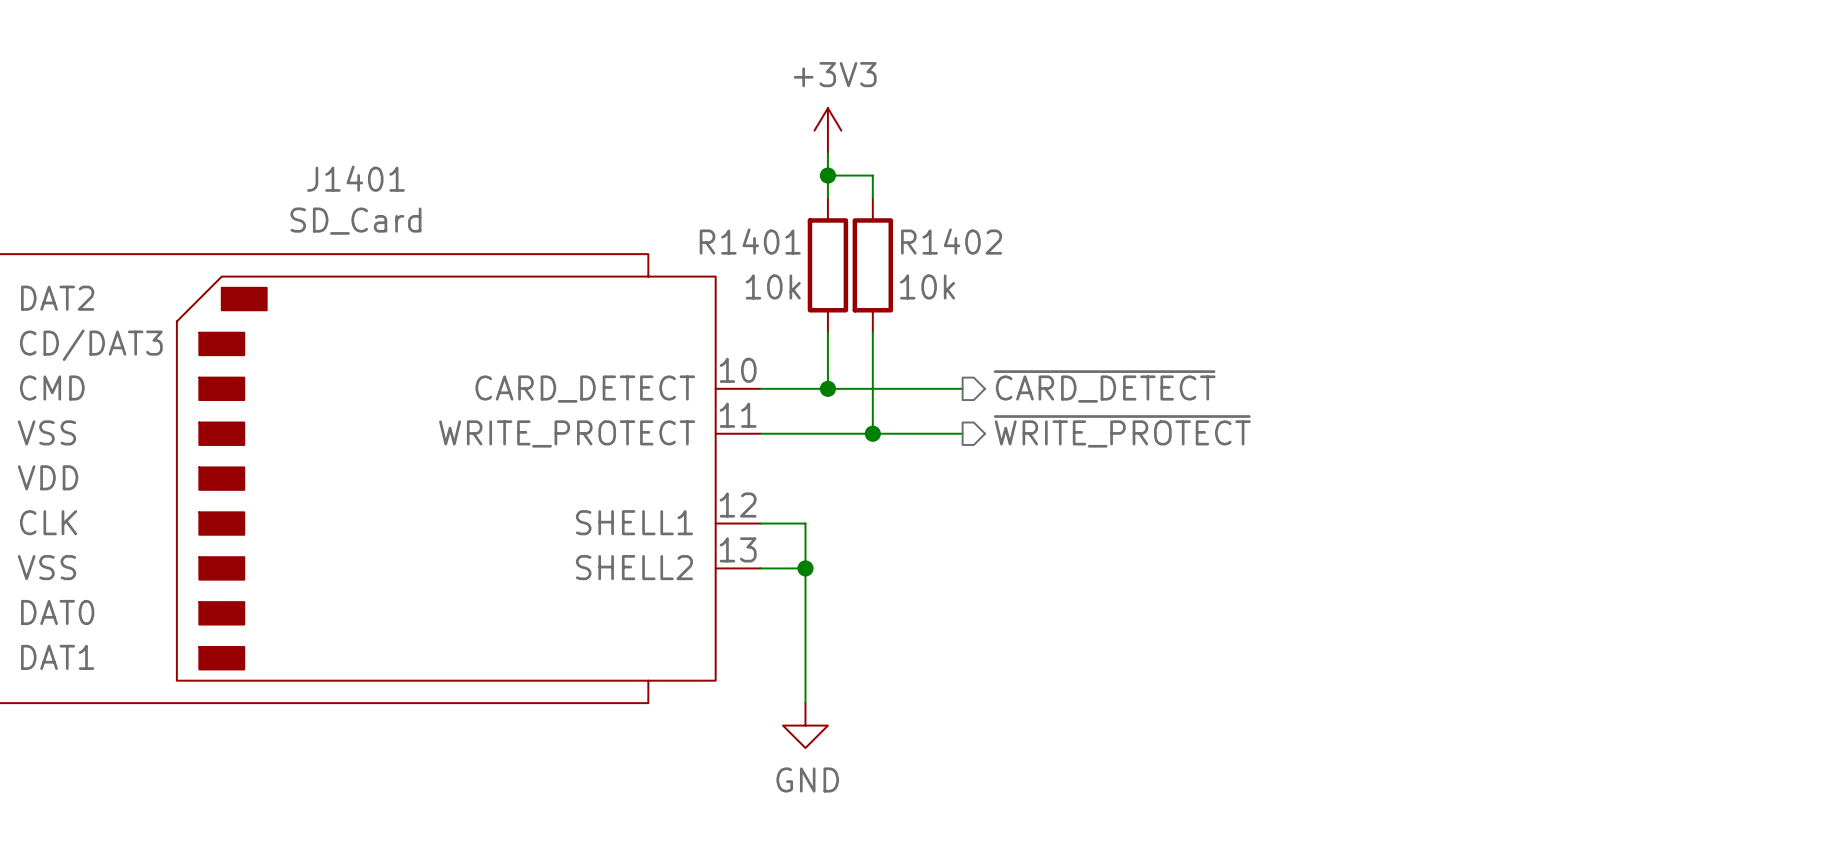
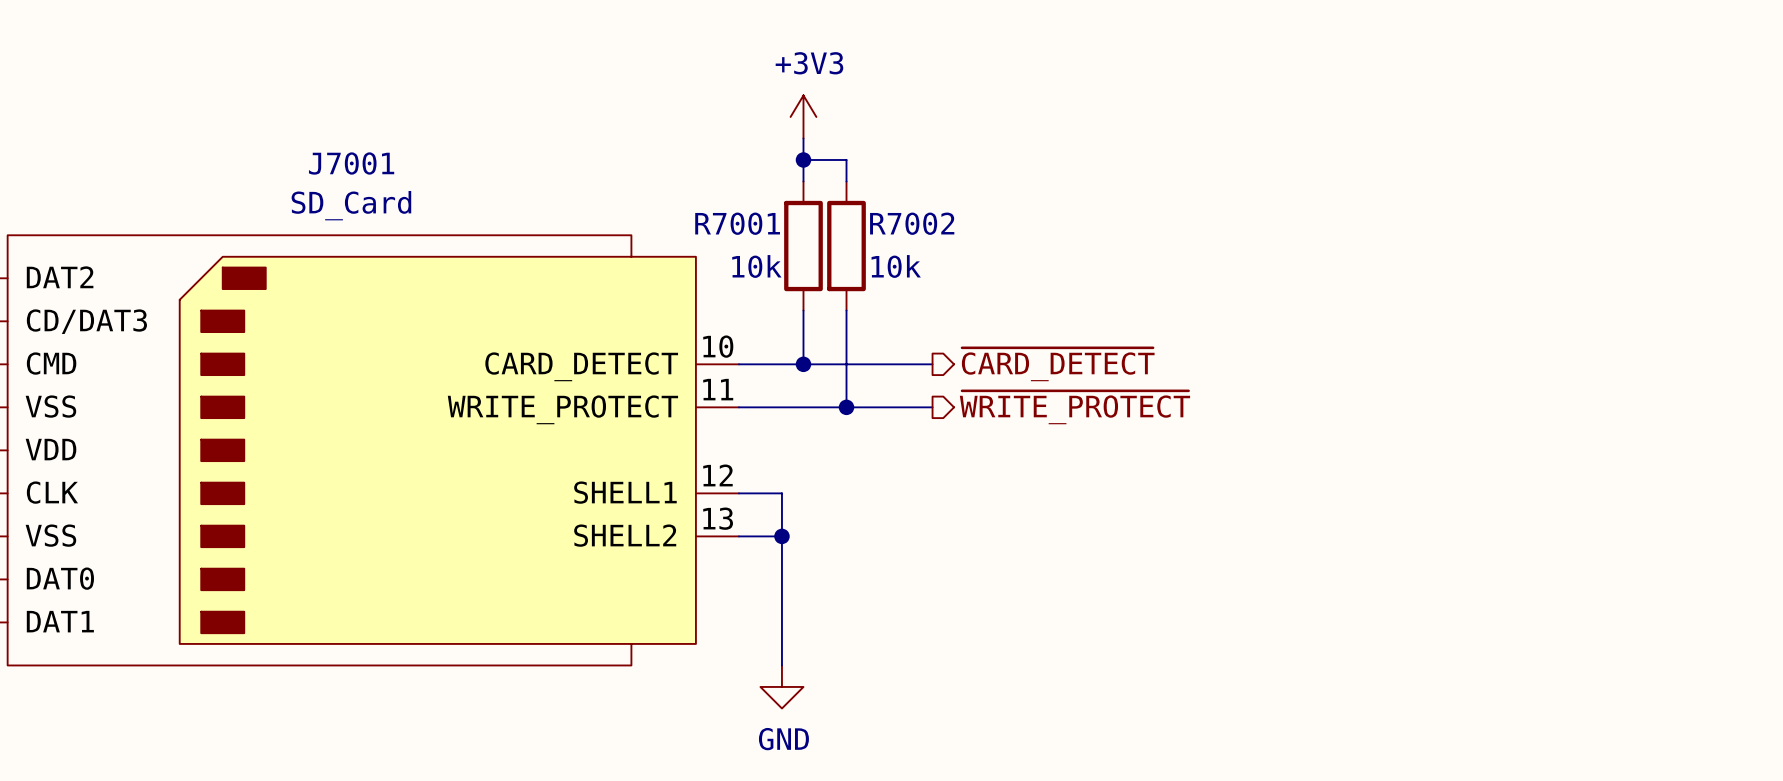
J1401 name: J1401 (355, 178) -> J7001 (351, 163)
R1401 name: R1401 (750, 241) -> R7001 (737, 223)
R1402 name: R1402 (951, 241) -> R7002 (912, 223)

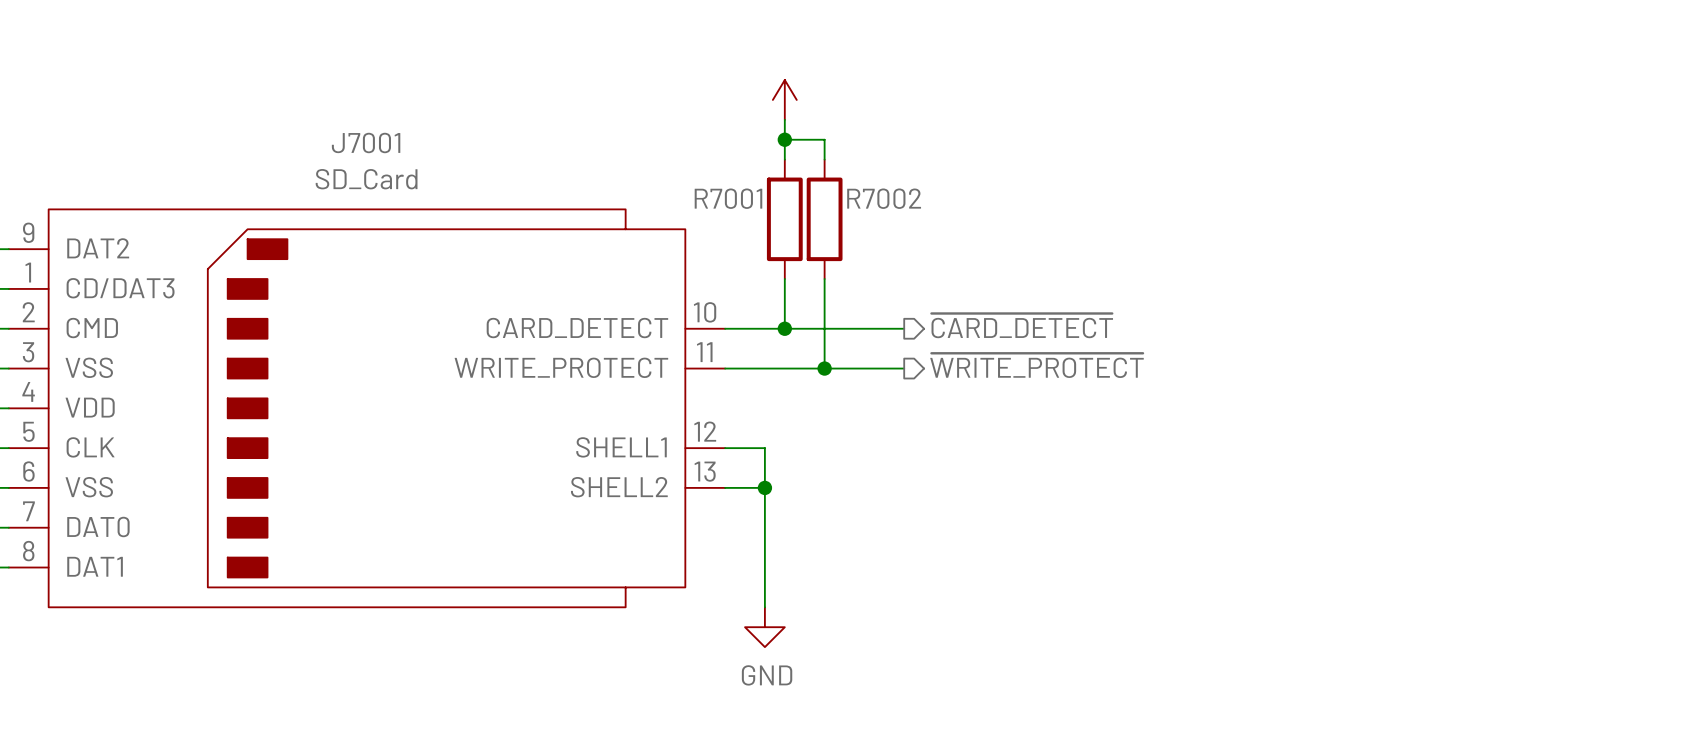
power symbol text: +3V3 (809, 63) -> none
R7001 value: 10k (756, 266) -> none
R7002 value: 10k (896, 266) -> none

